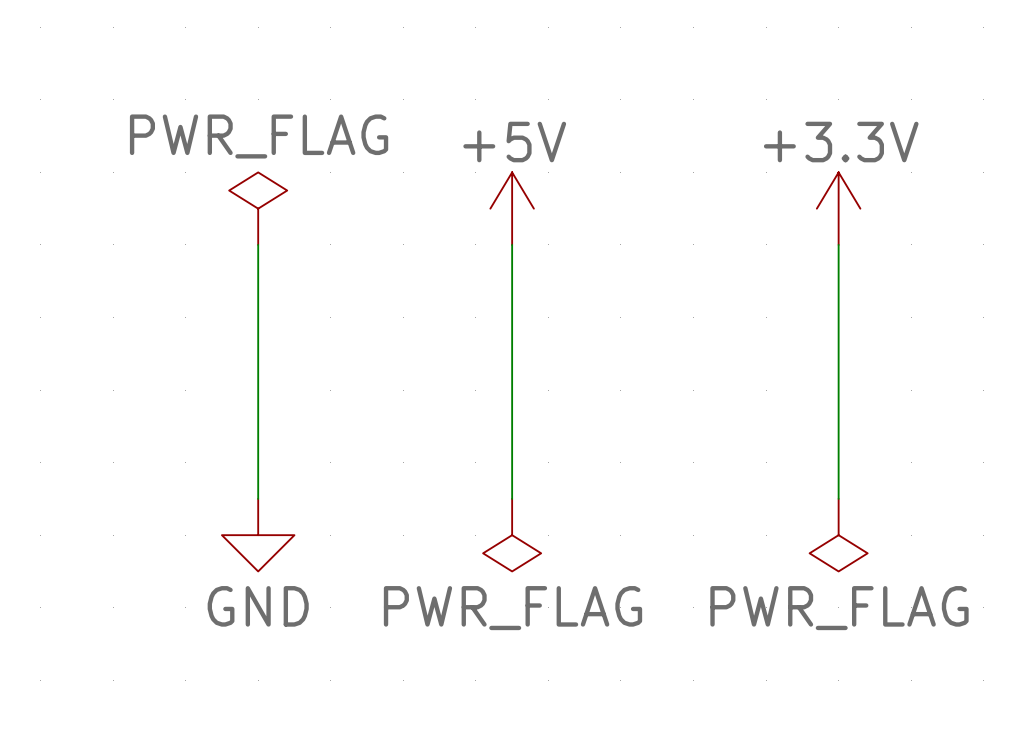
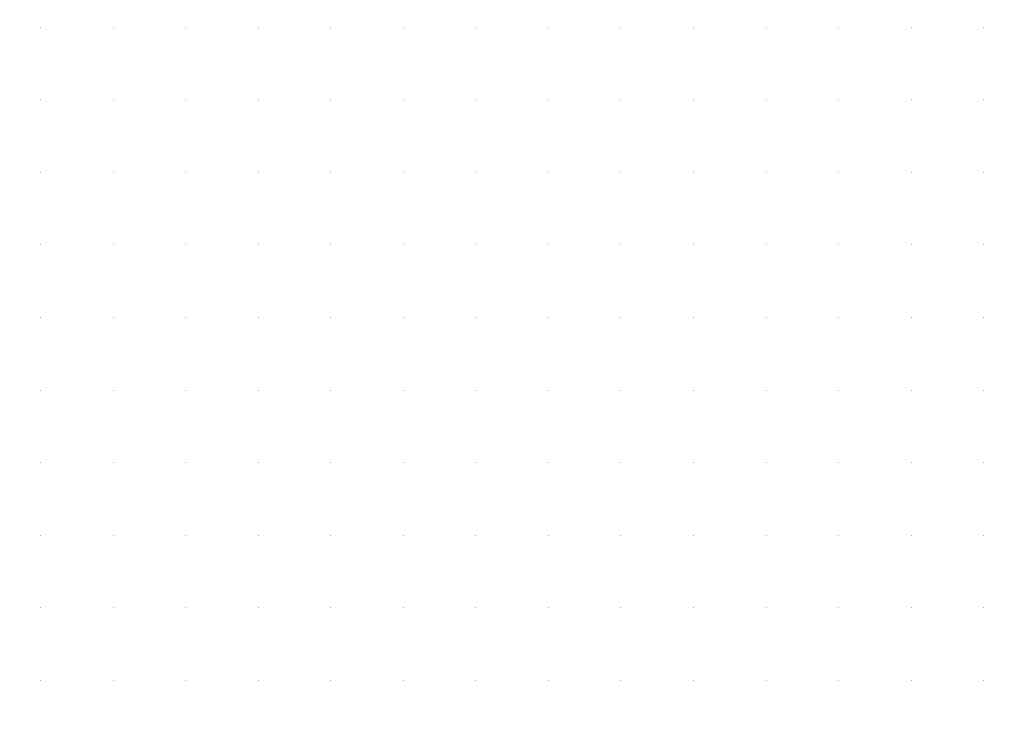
power symbol: PWR_FLAG (258, 208) -> none
power symbol: +5V (512, 208) -> none
power symbol: +3.3V (838, 208) -> none
wire: (258, 244) (258, 498) -> none
wire: (512, 244) (512, 498) -> none
wire: (838, 244) (838, 498) -> none
power symbol: GND (258, 535) -> none
power symbol: PWR_FLAG (512, 535) -> none
power symbol: PWR_FLAG (838, 535) -> none

